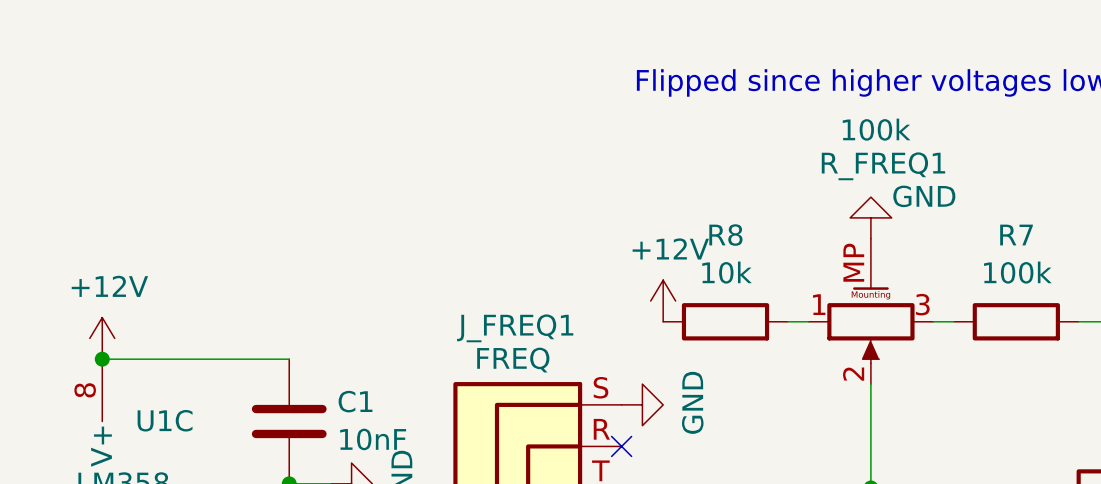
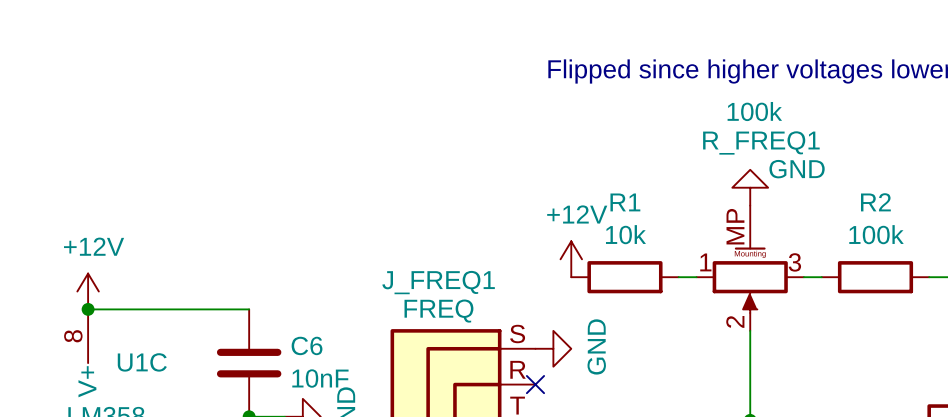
R8 name: R8 (725, 235) -> R1 (625, 202)
R7 name: R7 (1016, 235) -> R2 (875, 202)
C1 name: C1 (355, 401) -> C6 (307, 345)

